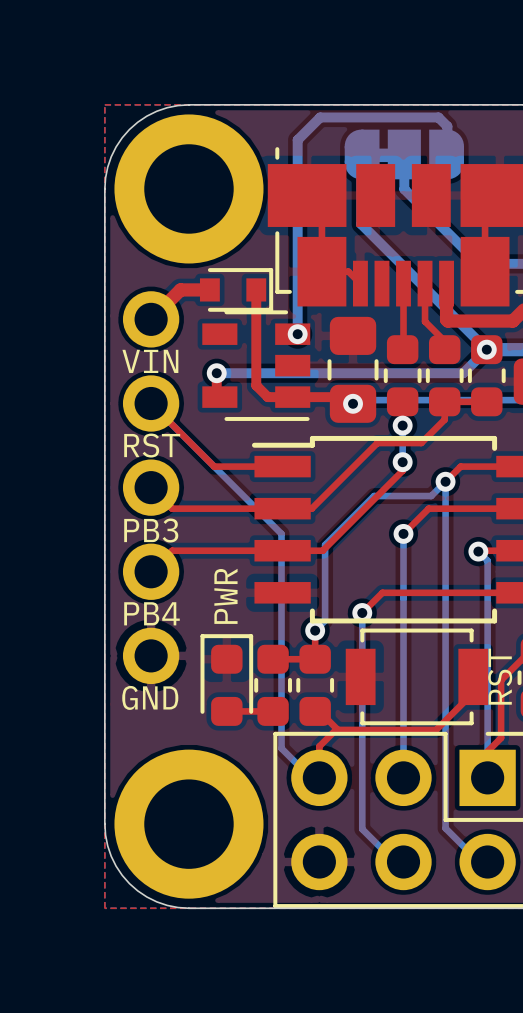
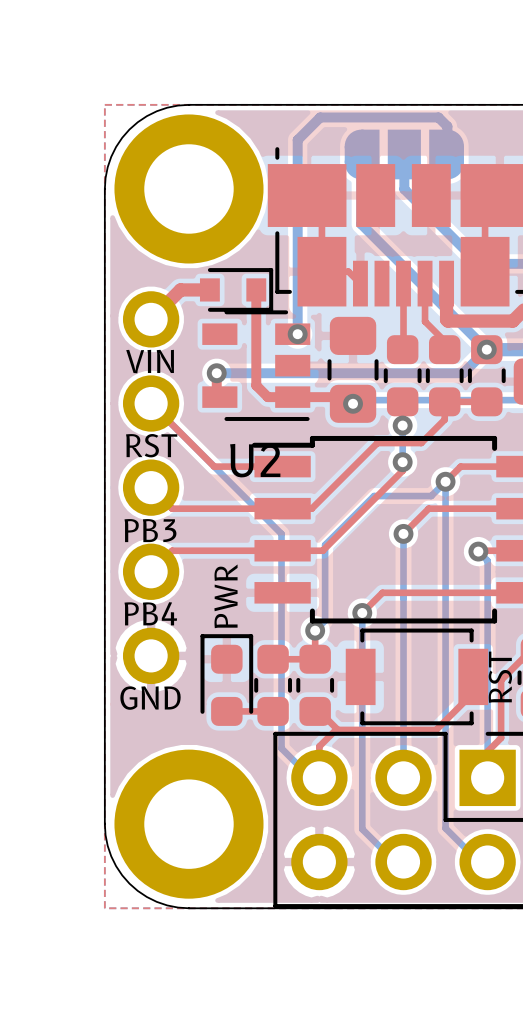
part footprint: [344, 129, 464, 180] -> [344, 129, 464, 180]
U2 name: none -> U2 (255, 460)

